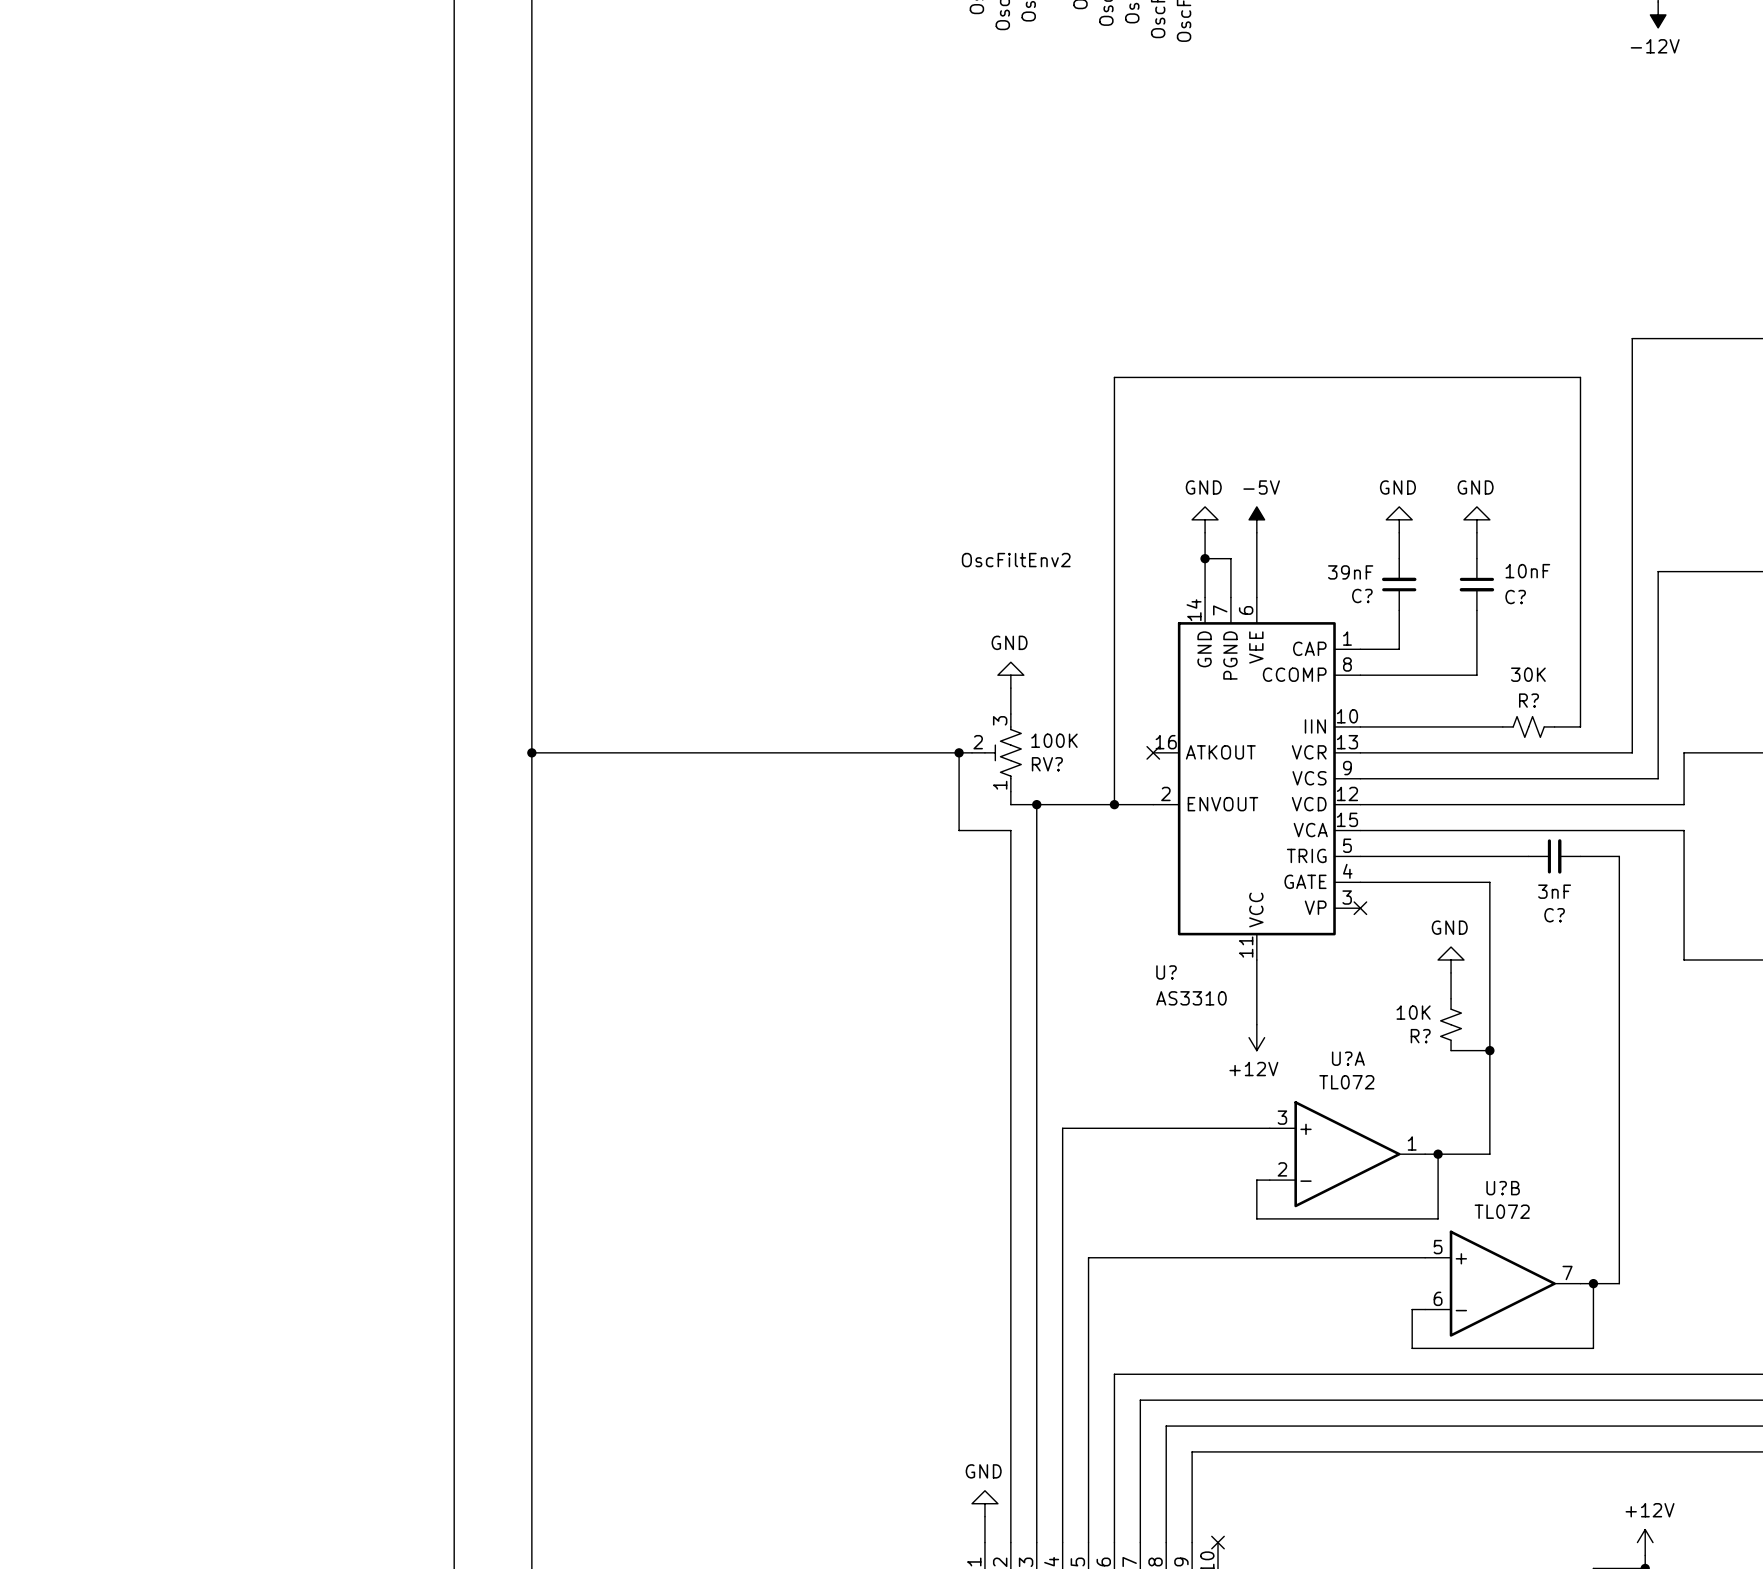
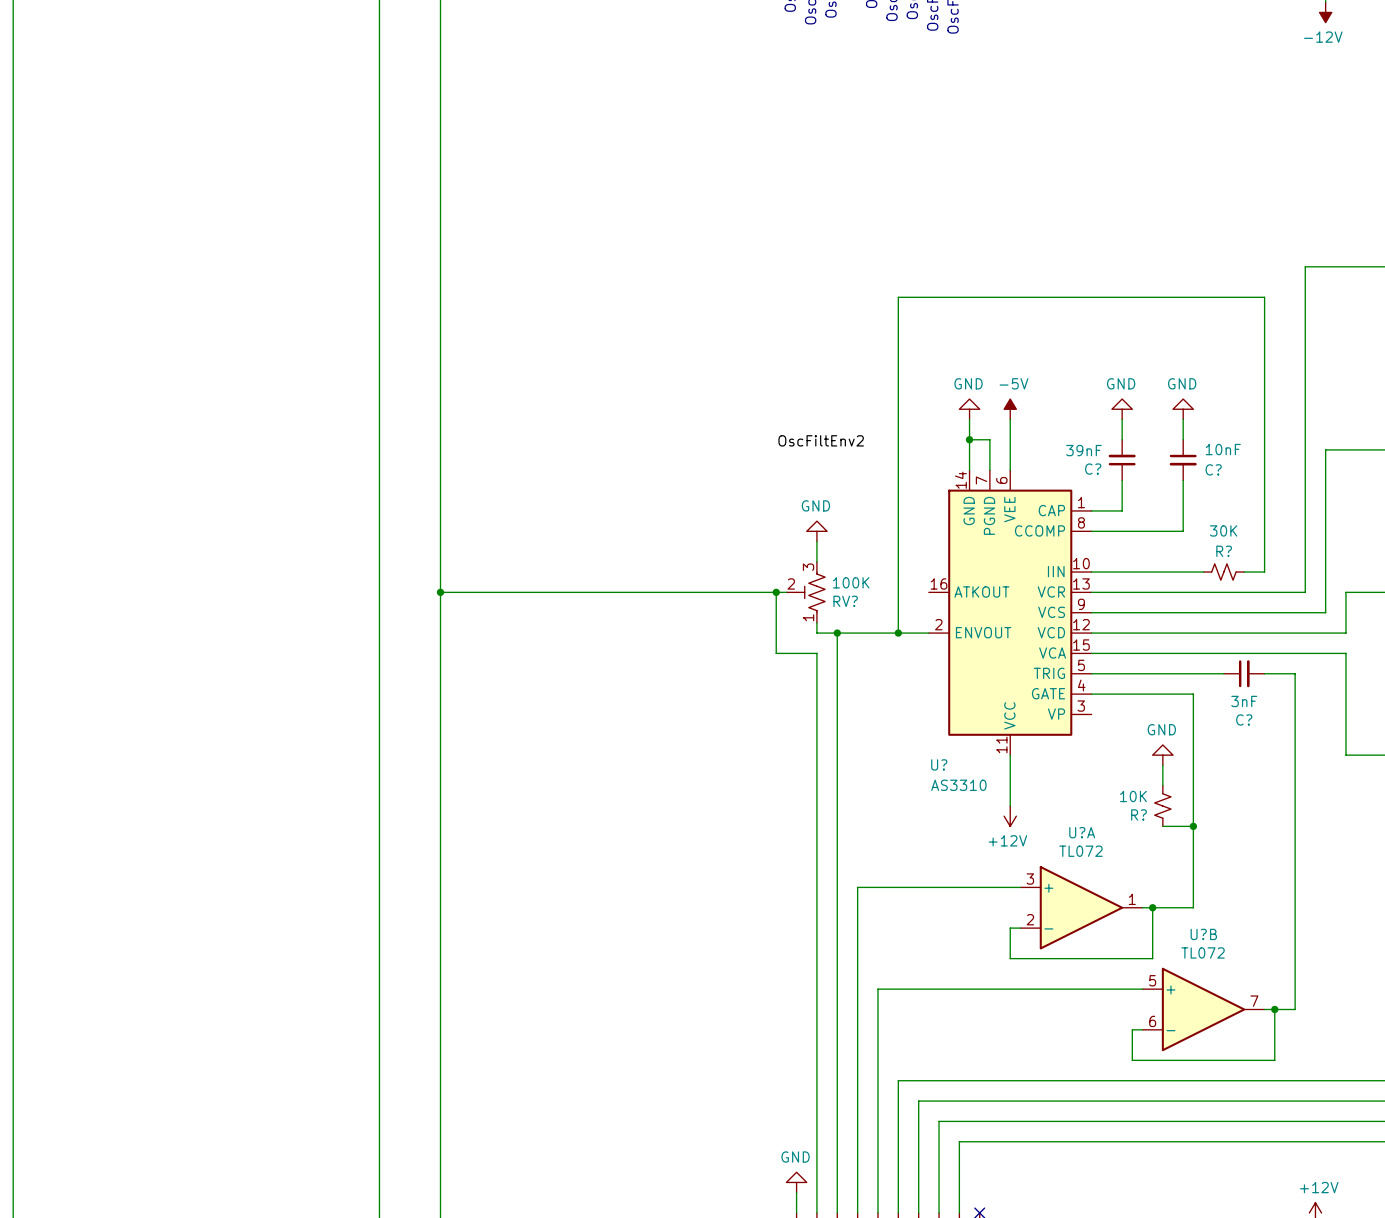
no-connect mark: (1153, 752) -> none
no-connect mark: (1360, 908) -> none

